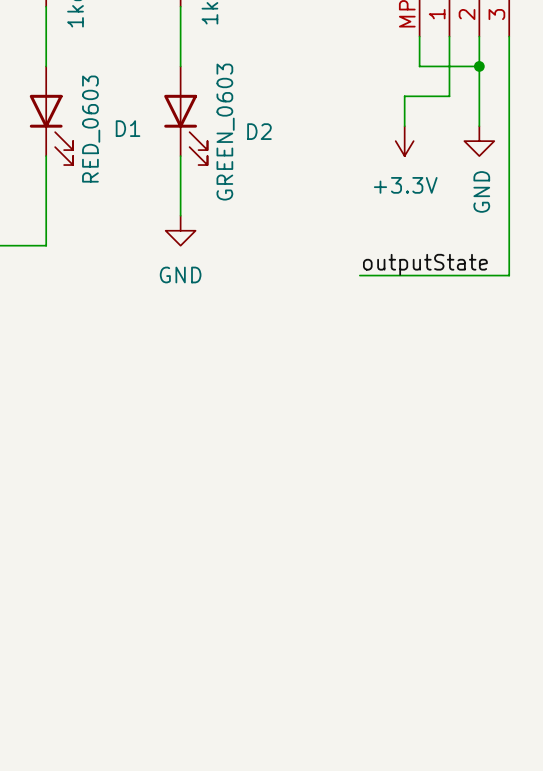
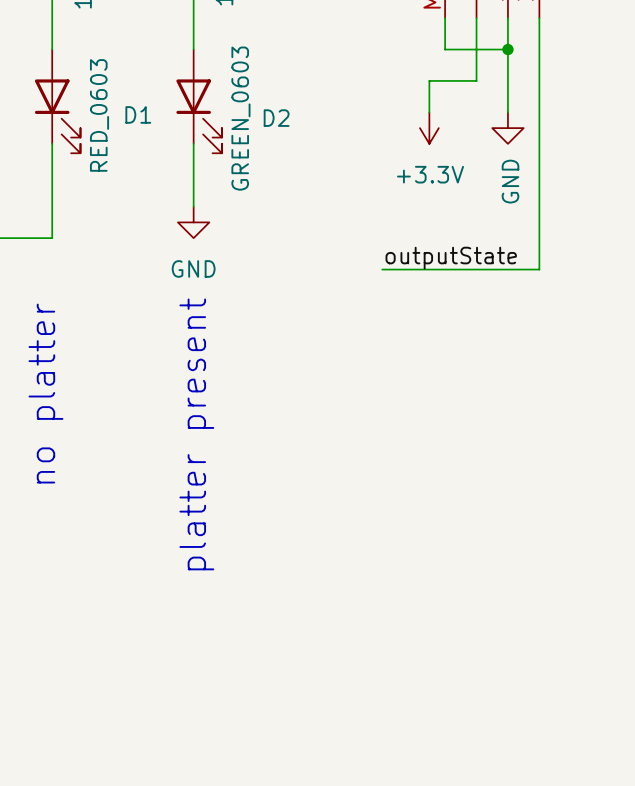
text: none -> no platter (45, 393)
text: none -> platter present (196, 434)

